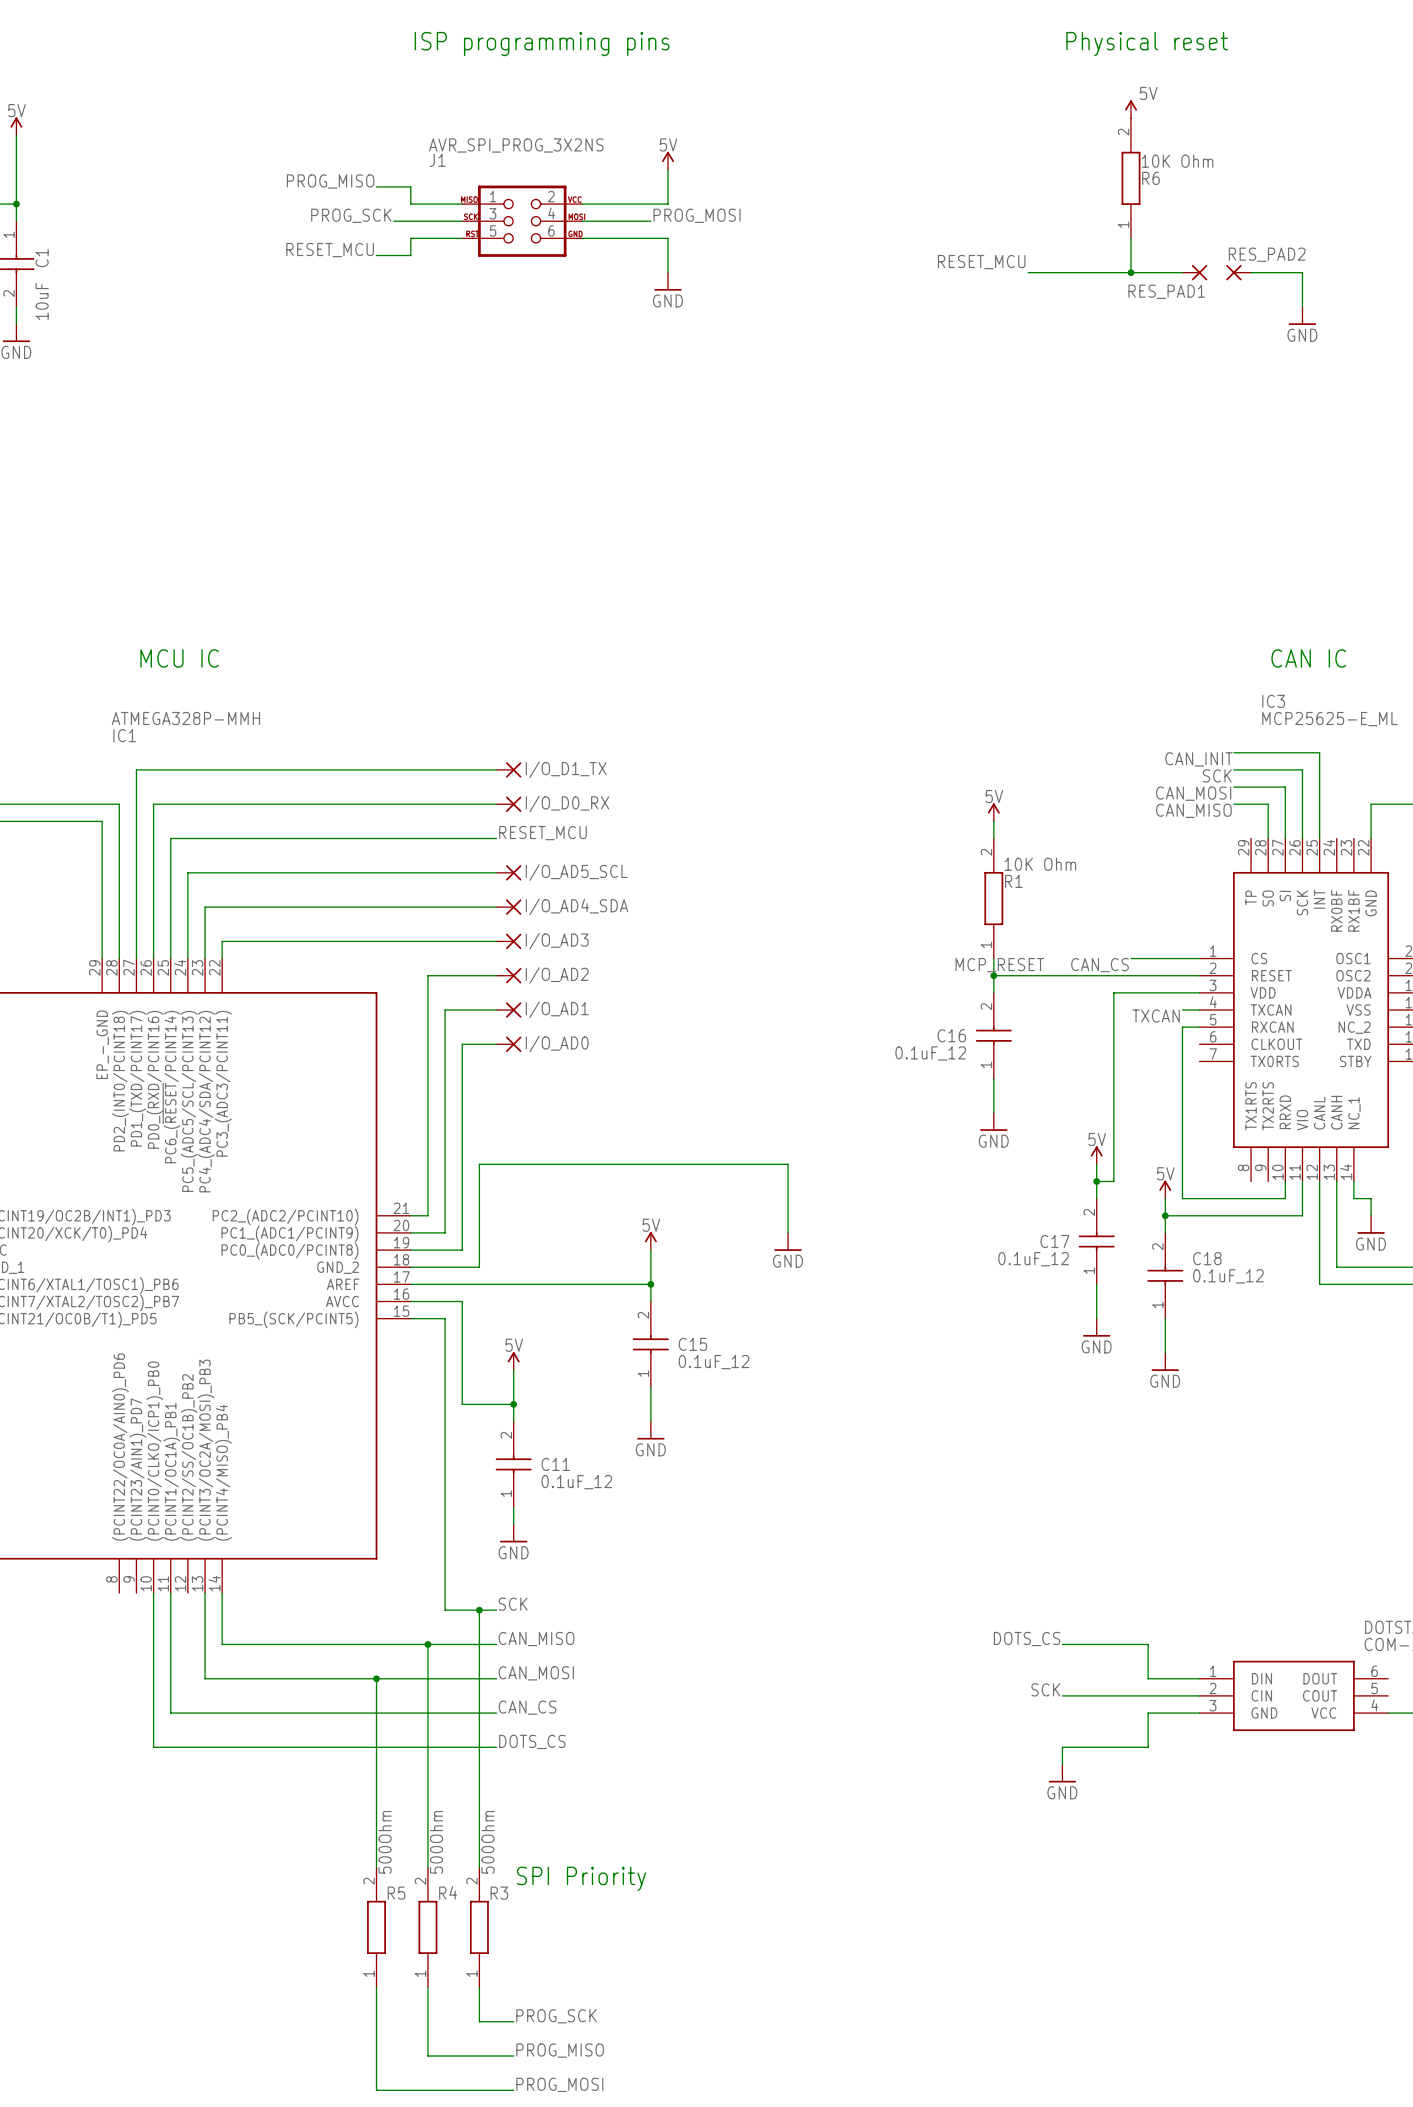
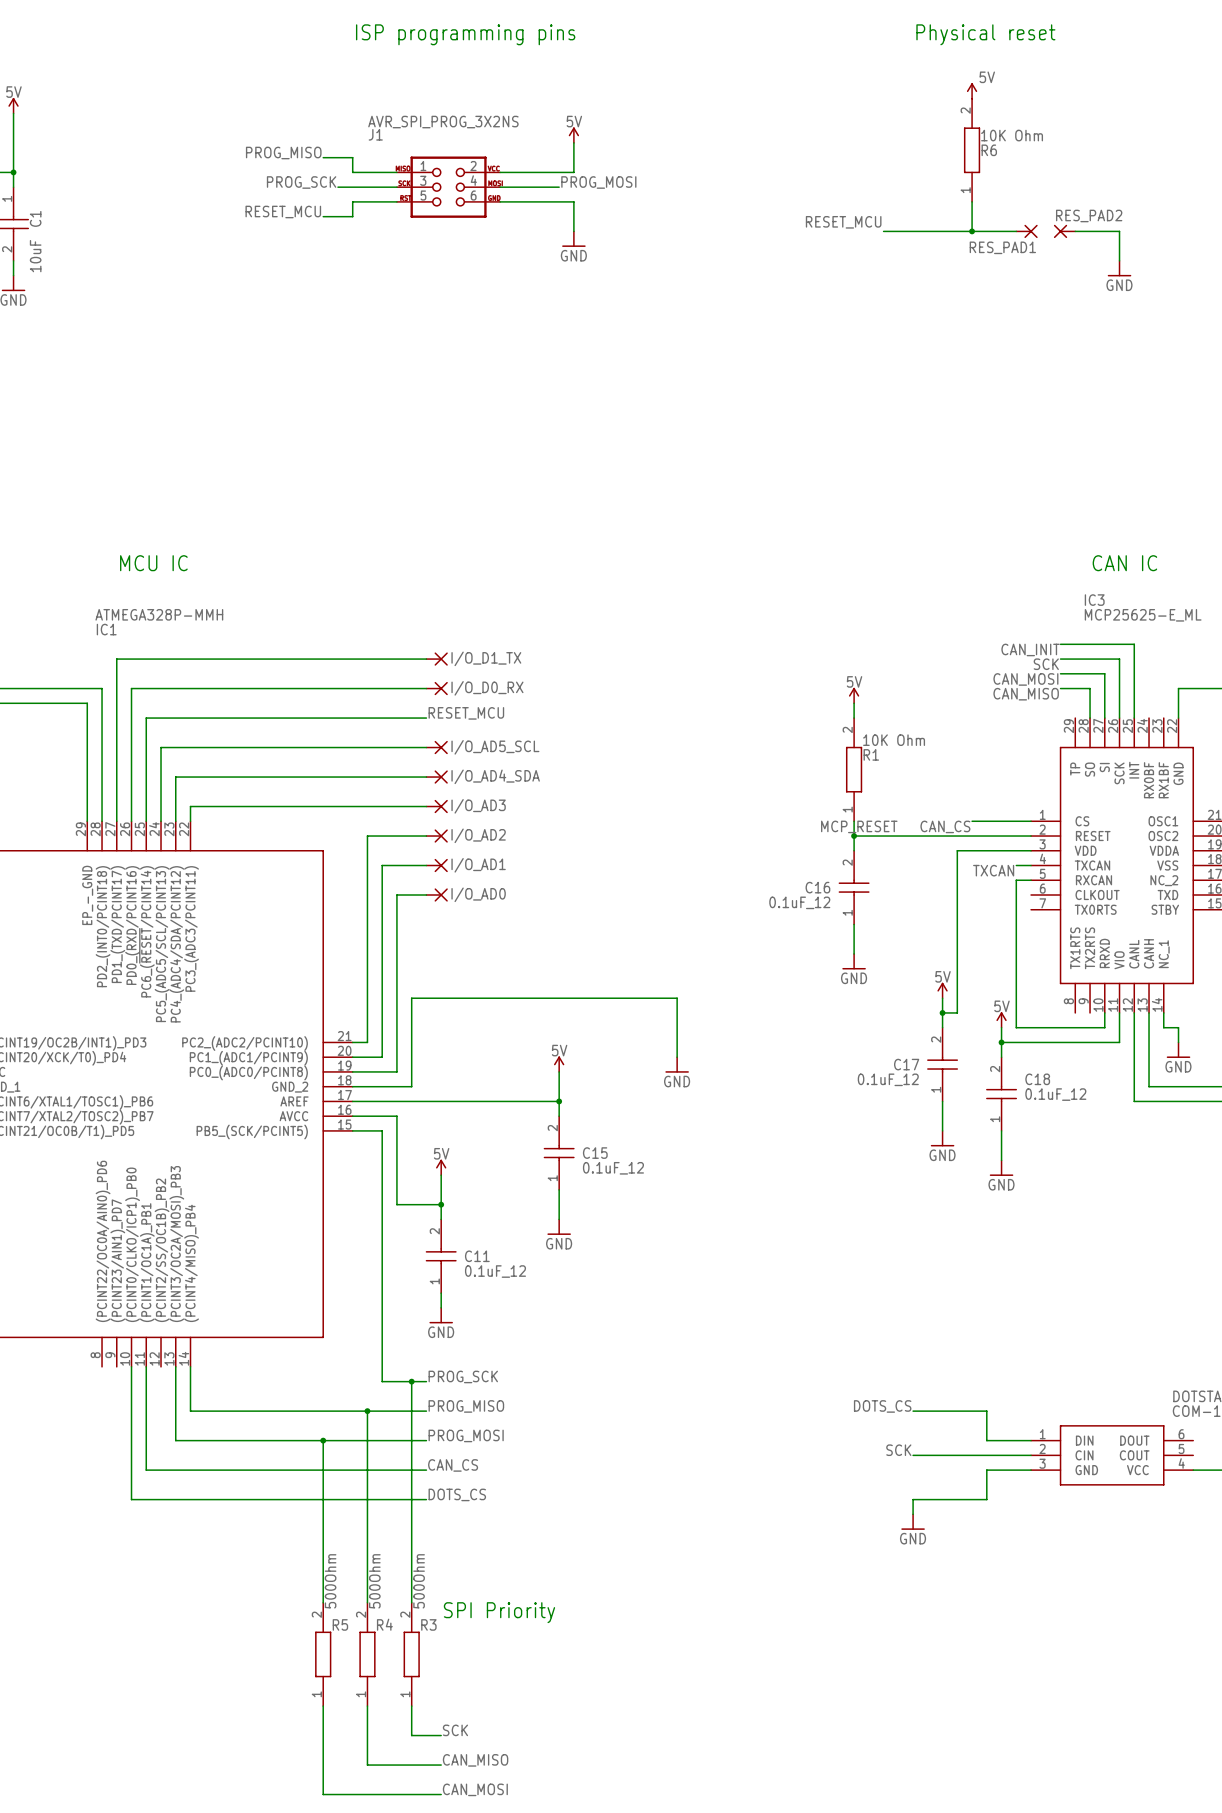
label: SCK (513, 1604) -> PROG_SCK (463, 1376)
label: CAN_MISO (536, 1639) -> PROG_MISO (466, 1406)
label: CAN_MOSI (536, 1673) -> PROG_MOSI (466, 1435)
label: PROG_SCK (556, 2016) -> SCK (455, 1730)
label: PROG_MISO (560, 2050) -> CAN_MISO (475, 1760)
label: PROG_MOSI (559, 2084) -> CAN_MOSI (475, 1789)

